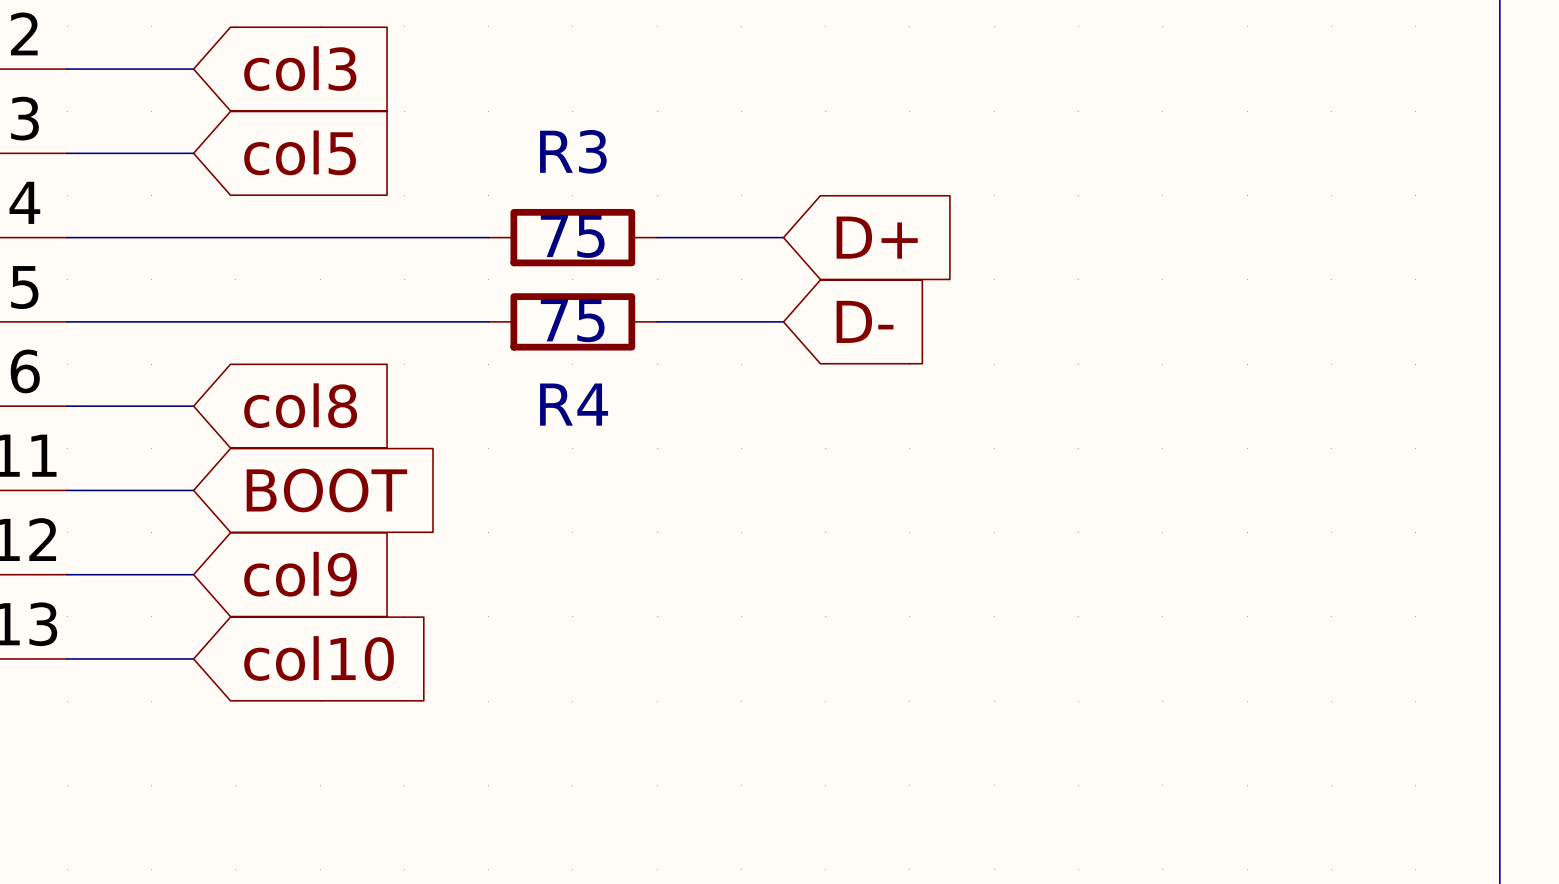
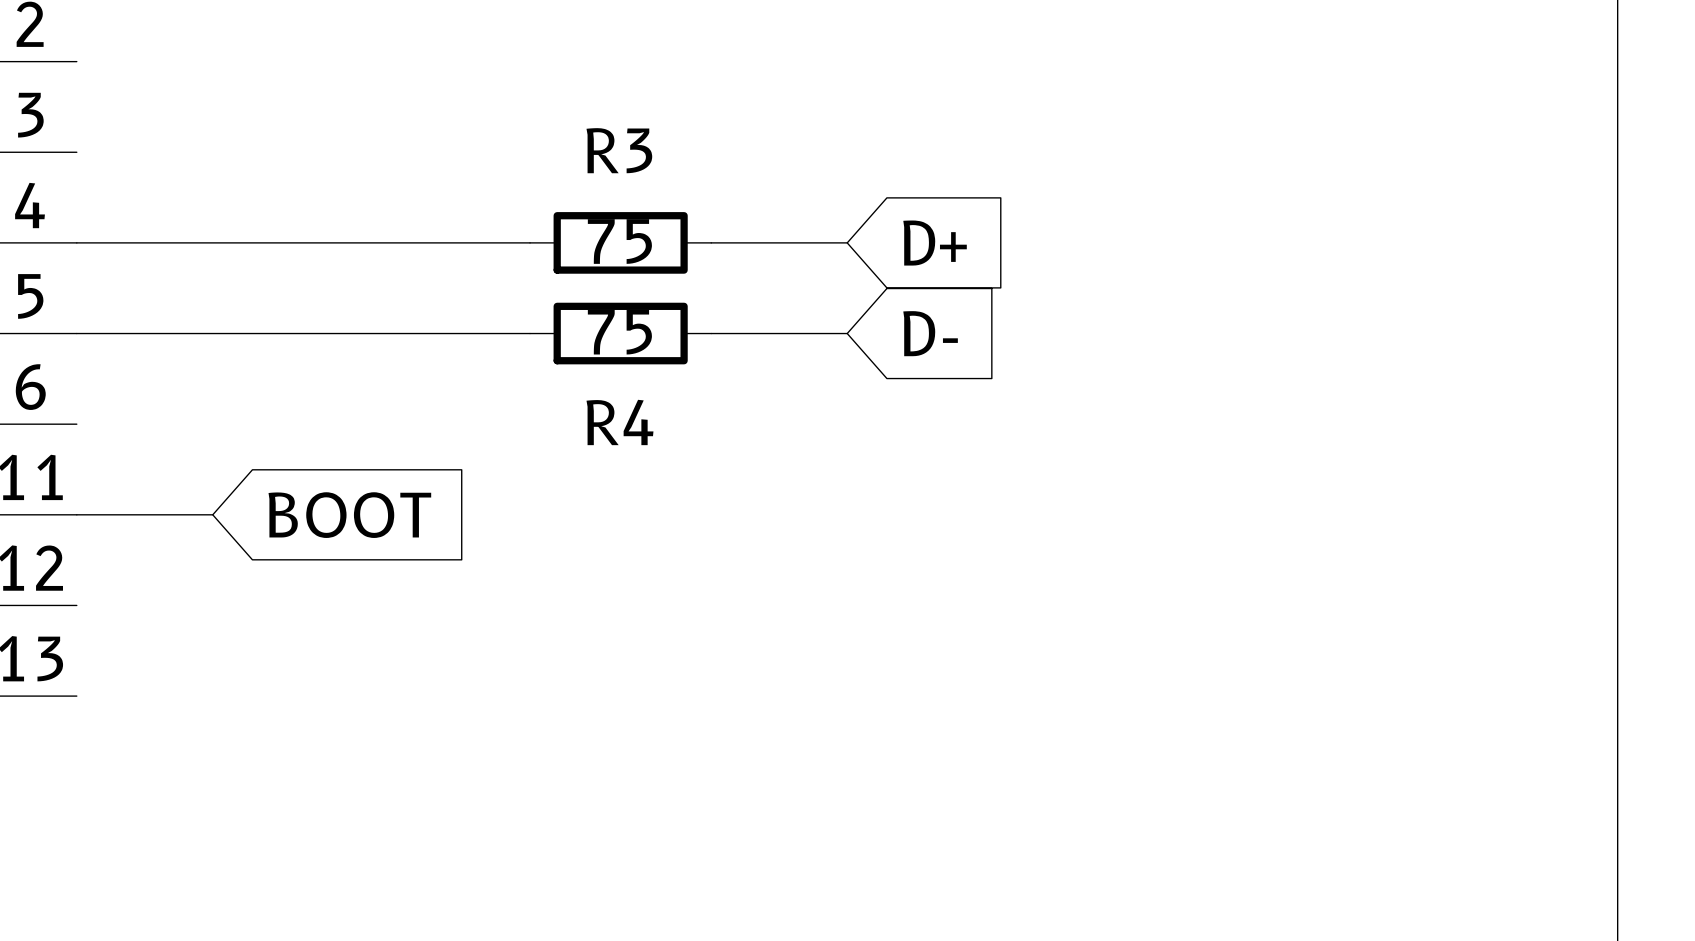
global label: col3 (300, 68) -> none
wire: (67, 69) (193, 69) -> none
global label: col5 (300, 152) -> none
wire: (67, 153) (193, 153) -> none
global label: col8 (300, 405) -> none
wire: (67, 406) (193, 406) -> none
wire: (67, 574) (193, 574) -> none
global label: col9 (300, 574) -> none
wire: (67, 658) (193, 658) -> none
global label: col10 (319, 658) -> none

